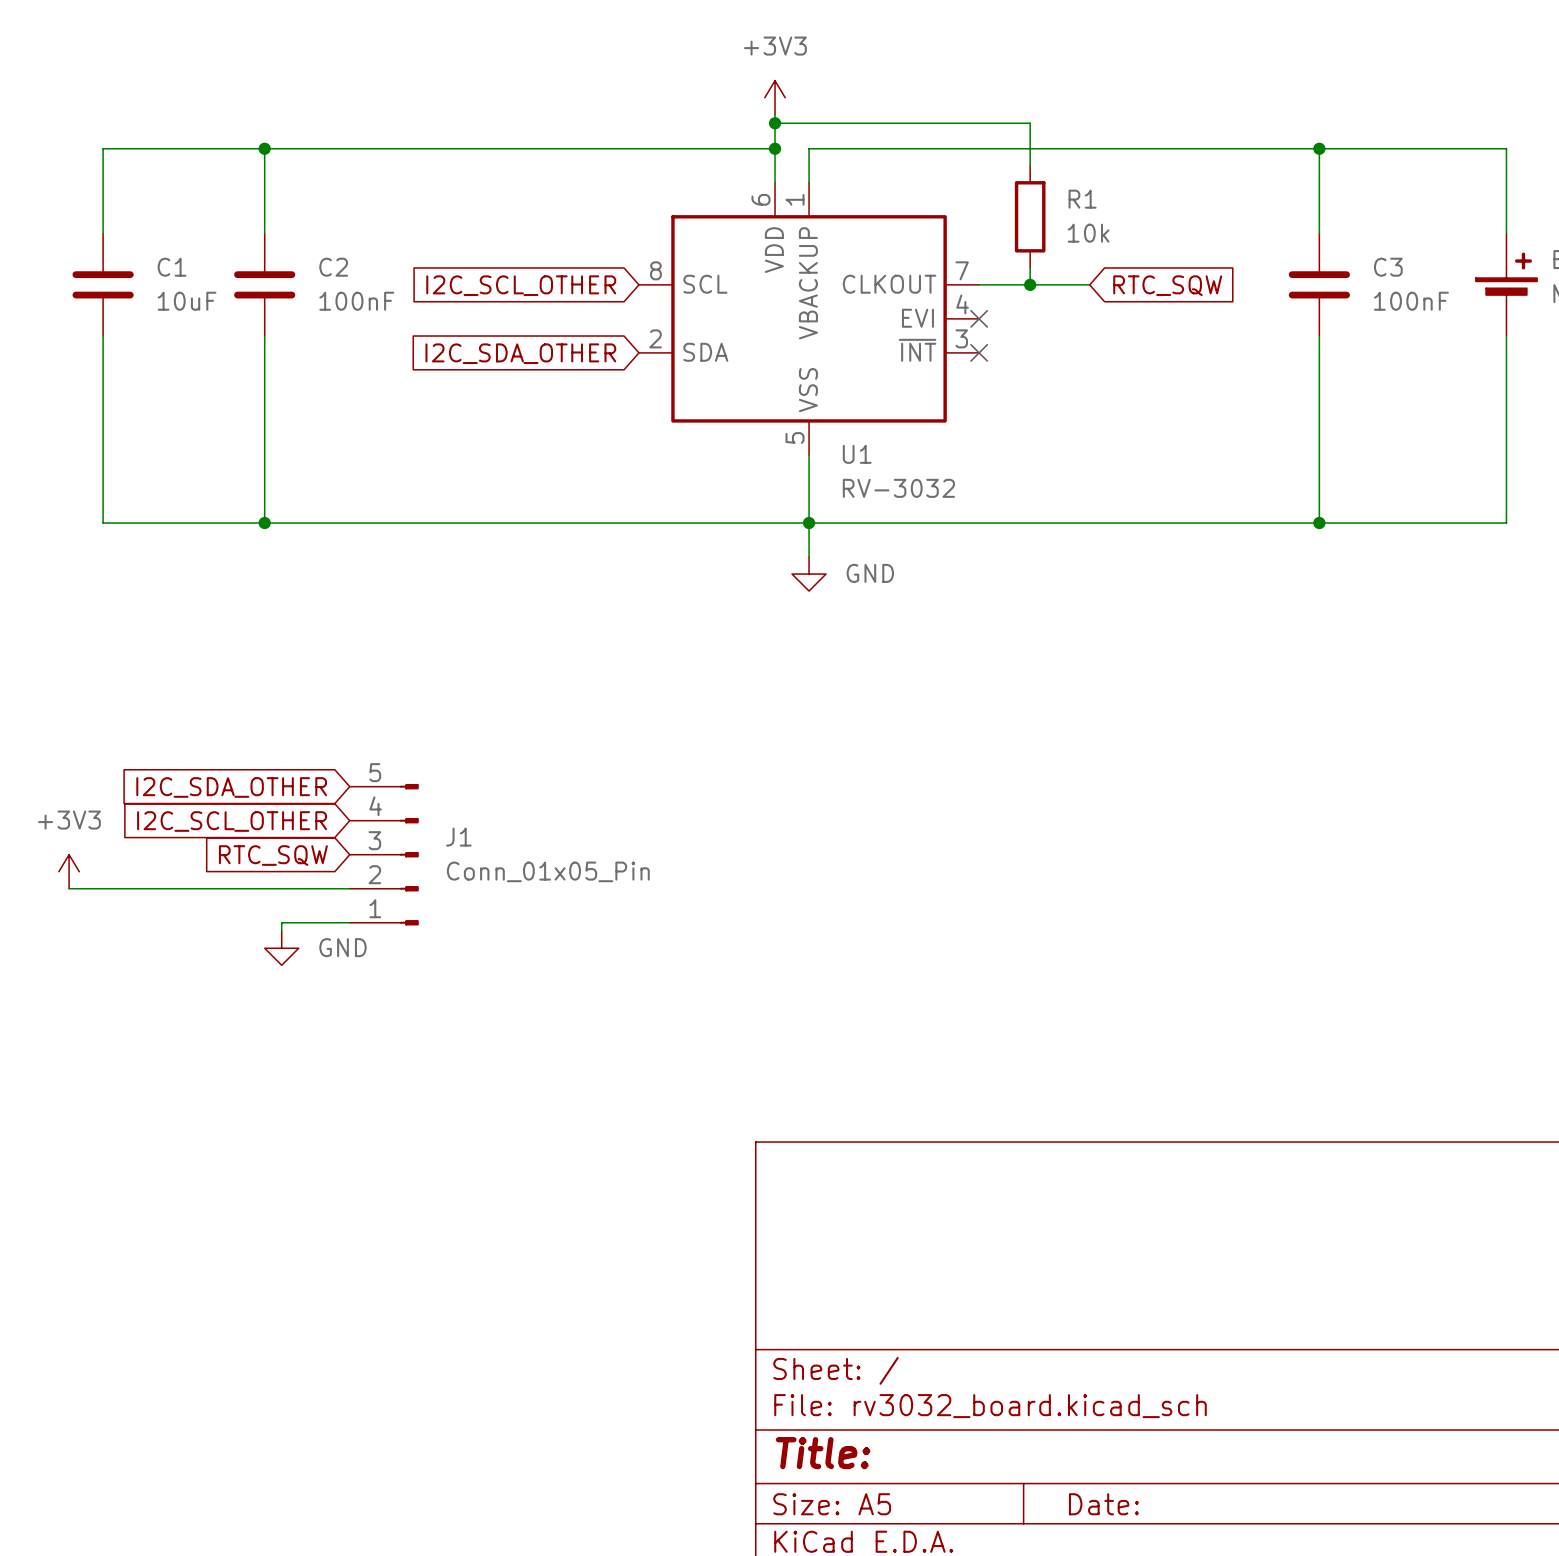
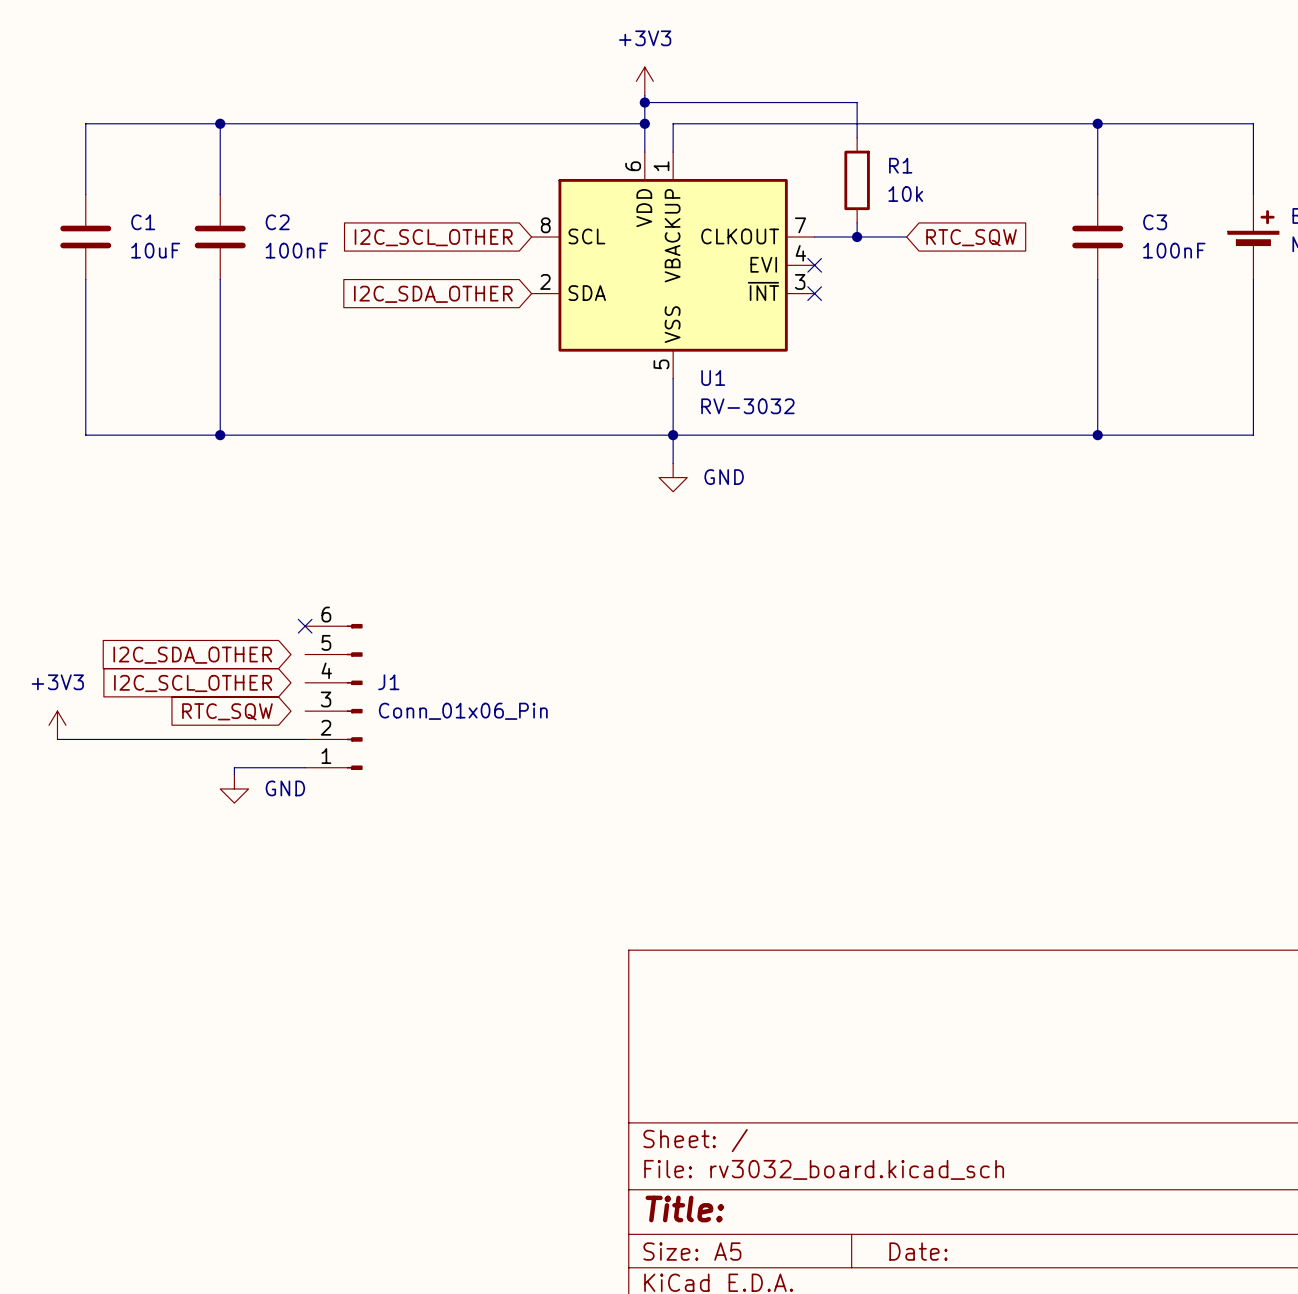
no-connect mark: none -> (305, 626)
J1 symbol: [349, 783, 419, 926] -> [305, 623, 363, 771]
J1 value: Conn_01x05_Pin (548, 871) -> Conn_01x06_Pin (463, 711)

